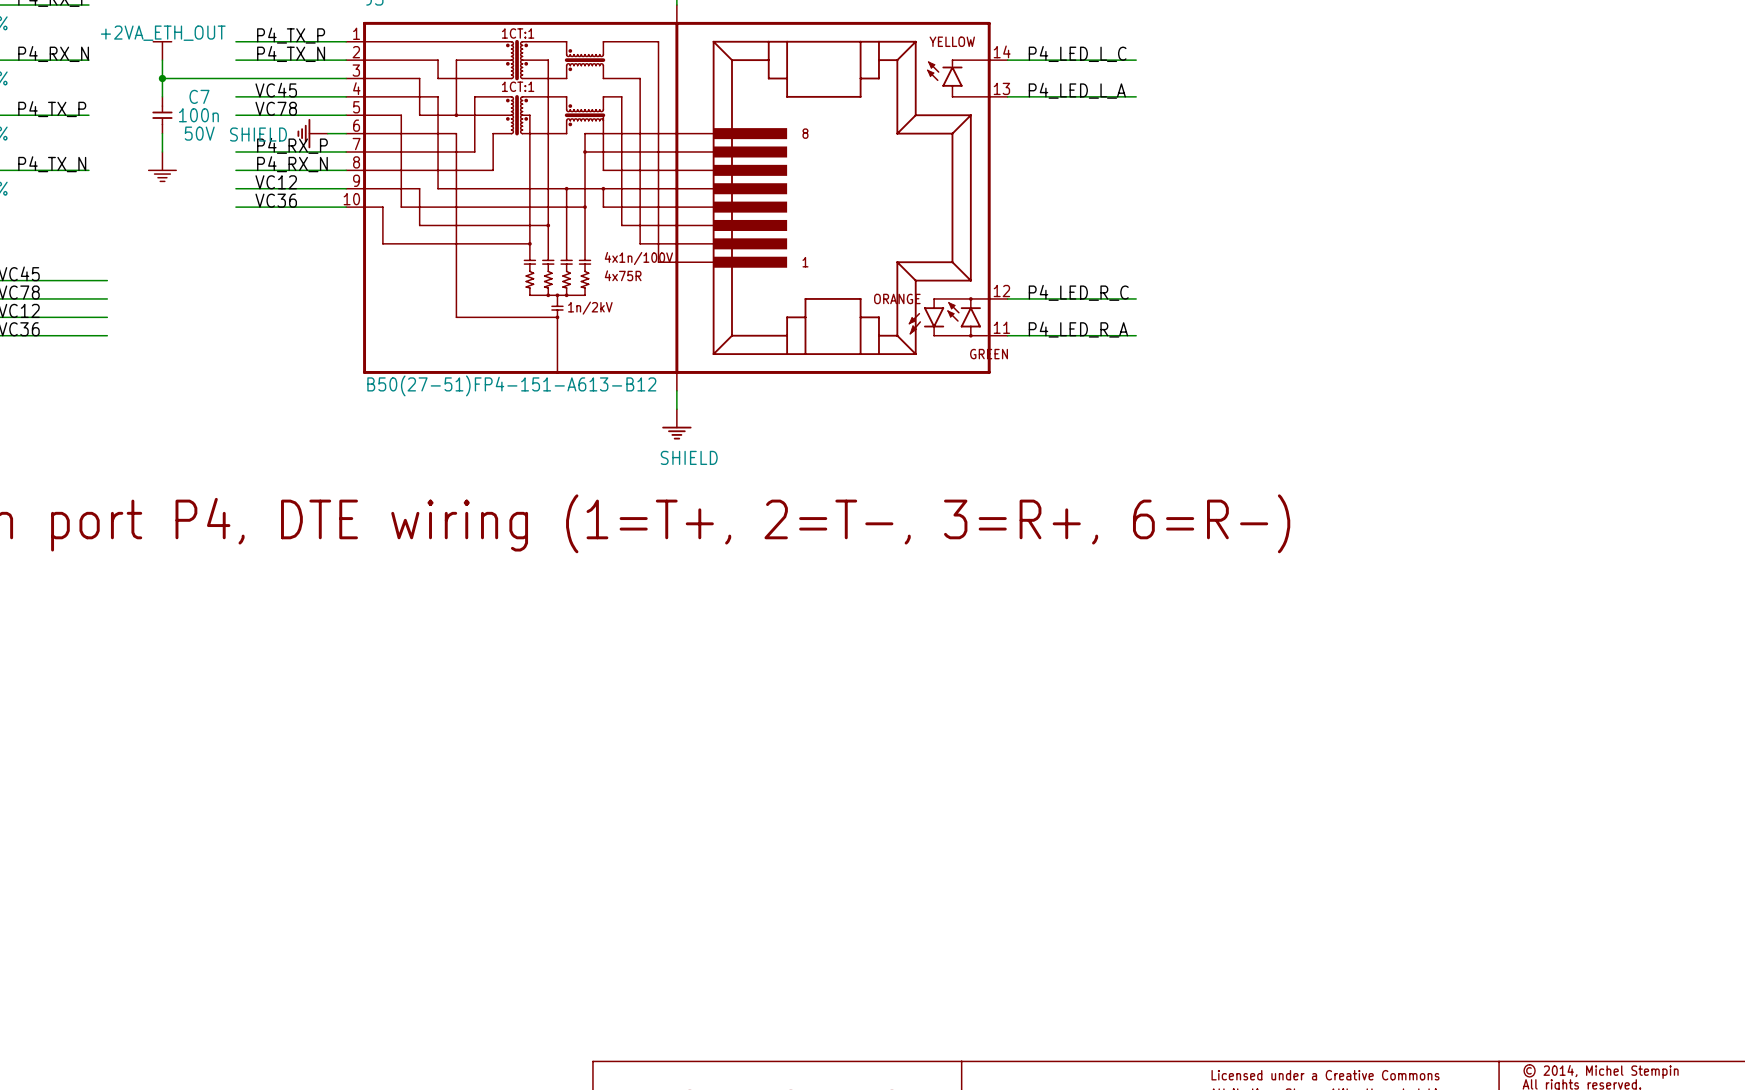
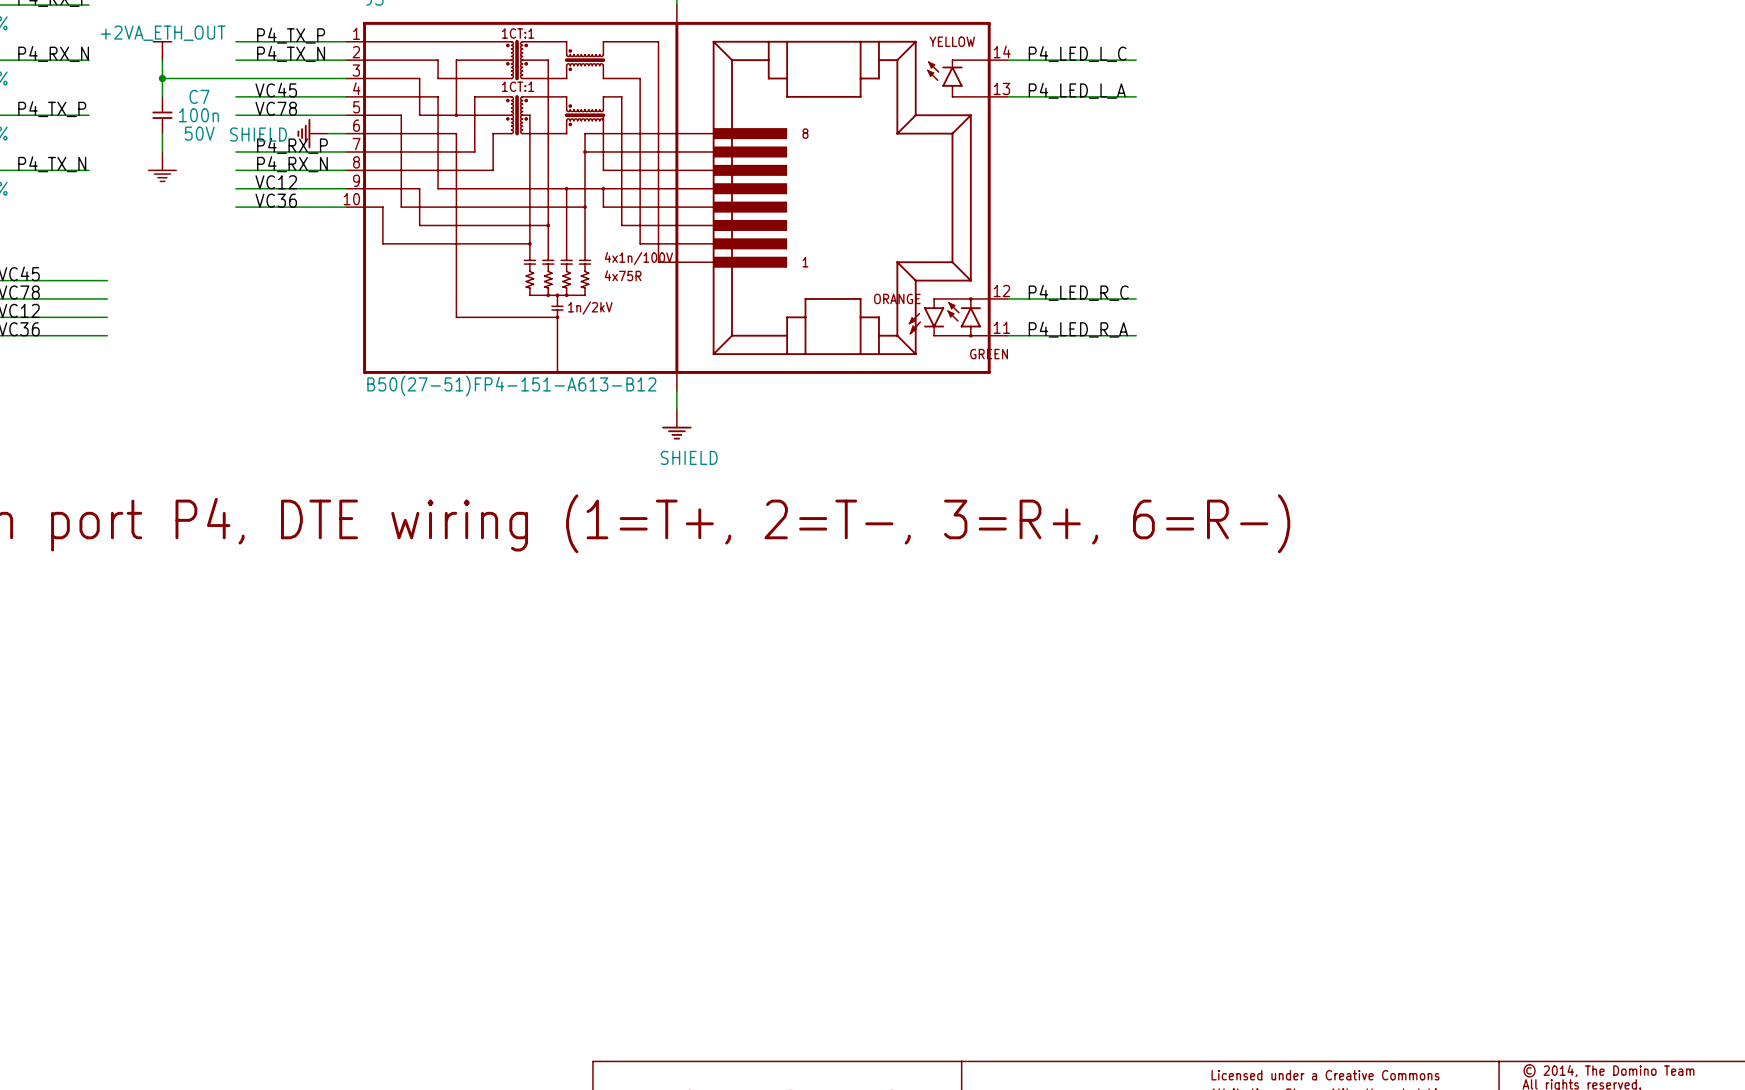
text: © 2014, Michel Stempin (1601, 1071) -> © 2014, The Domino Team (1608, 1070)

